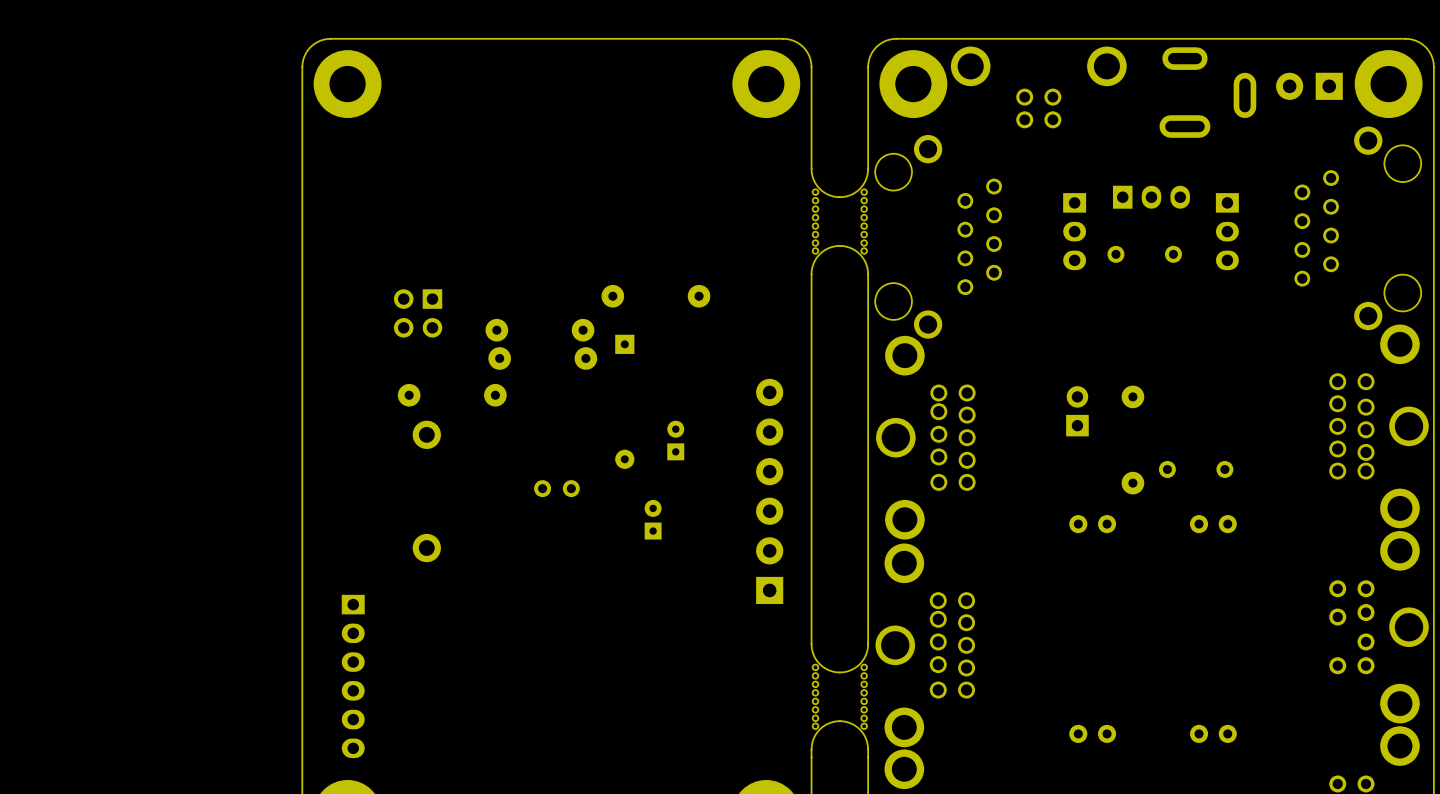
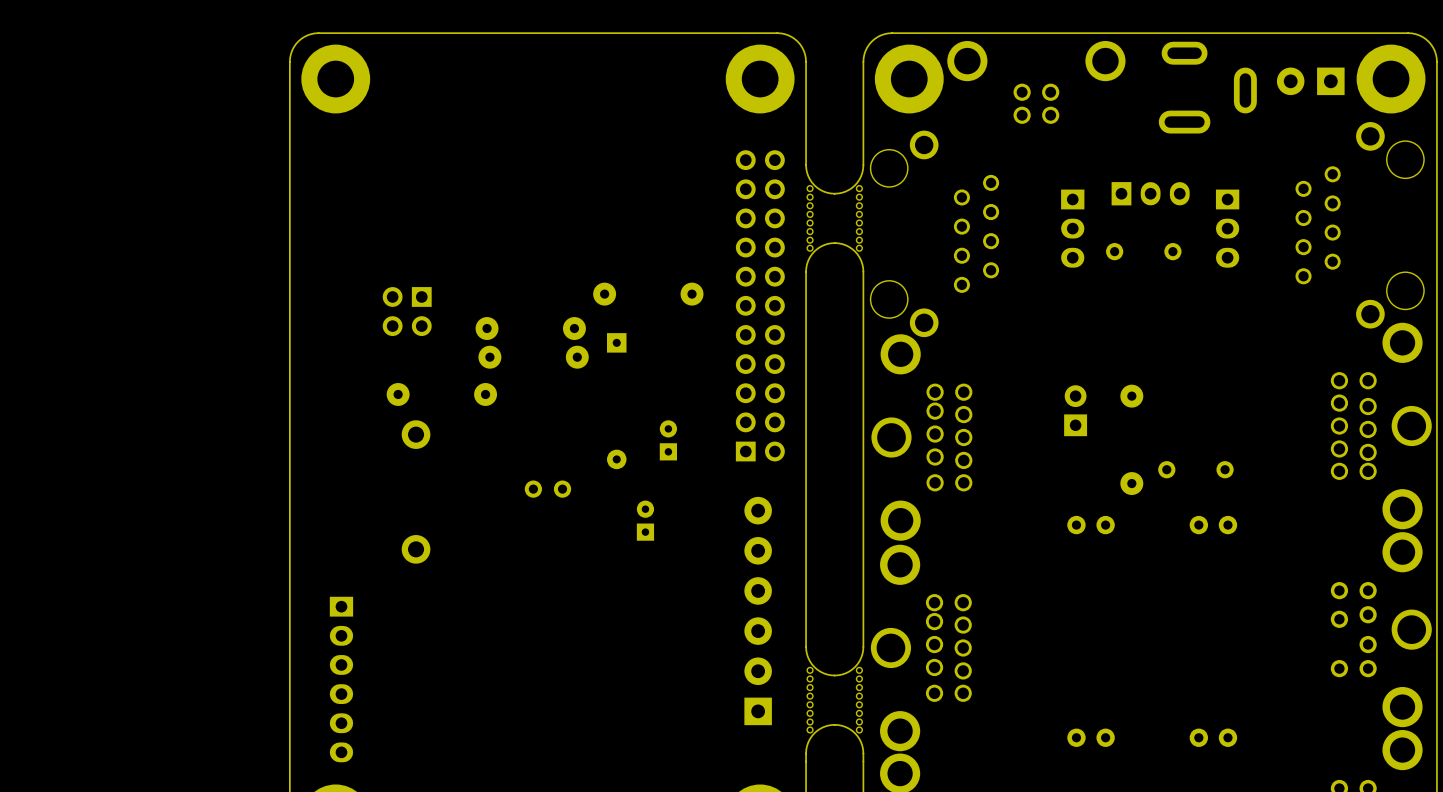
part: none -> (760, 305)
part position: (769, 491) -> (758, 611)

